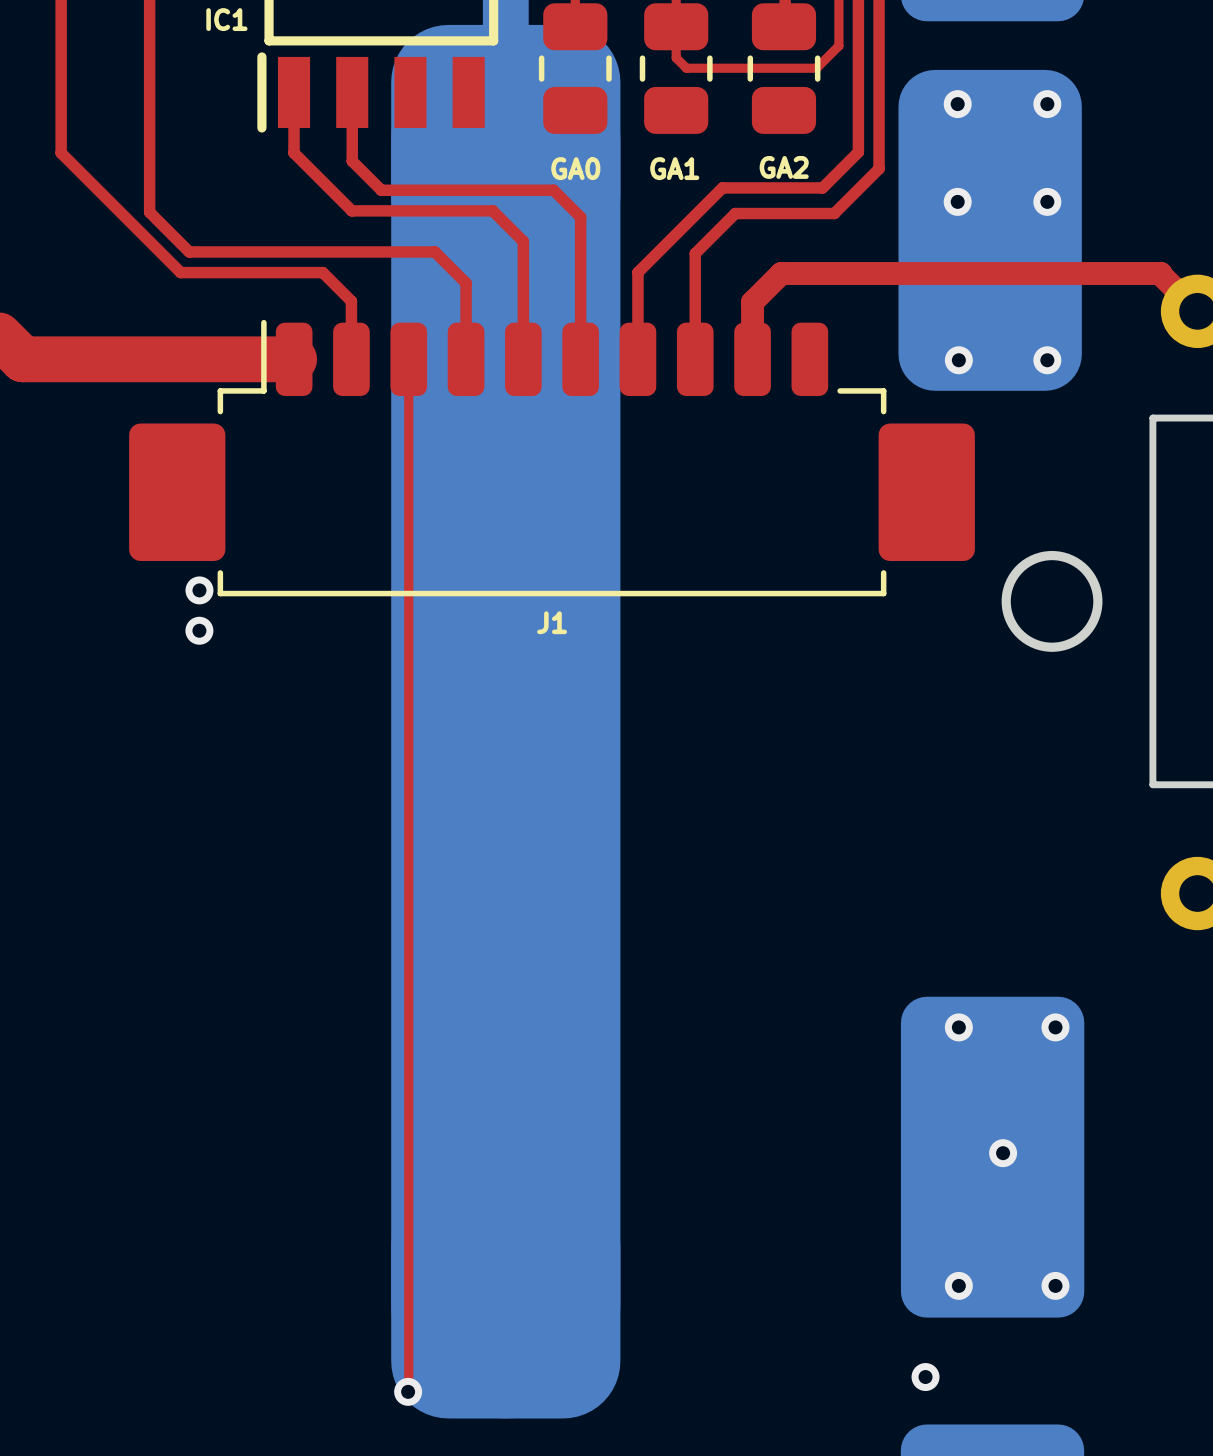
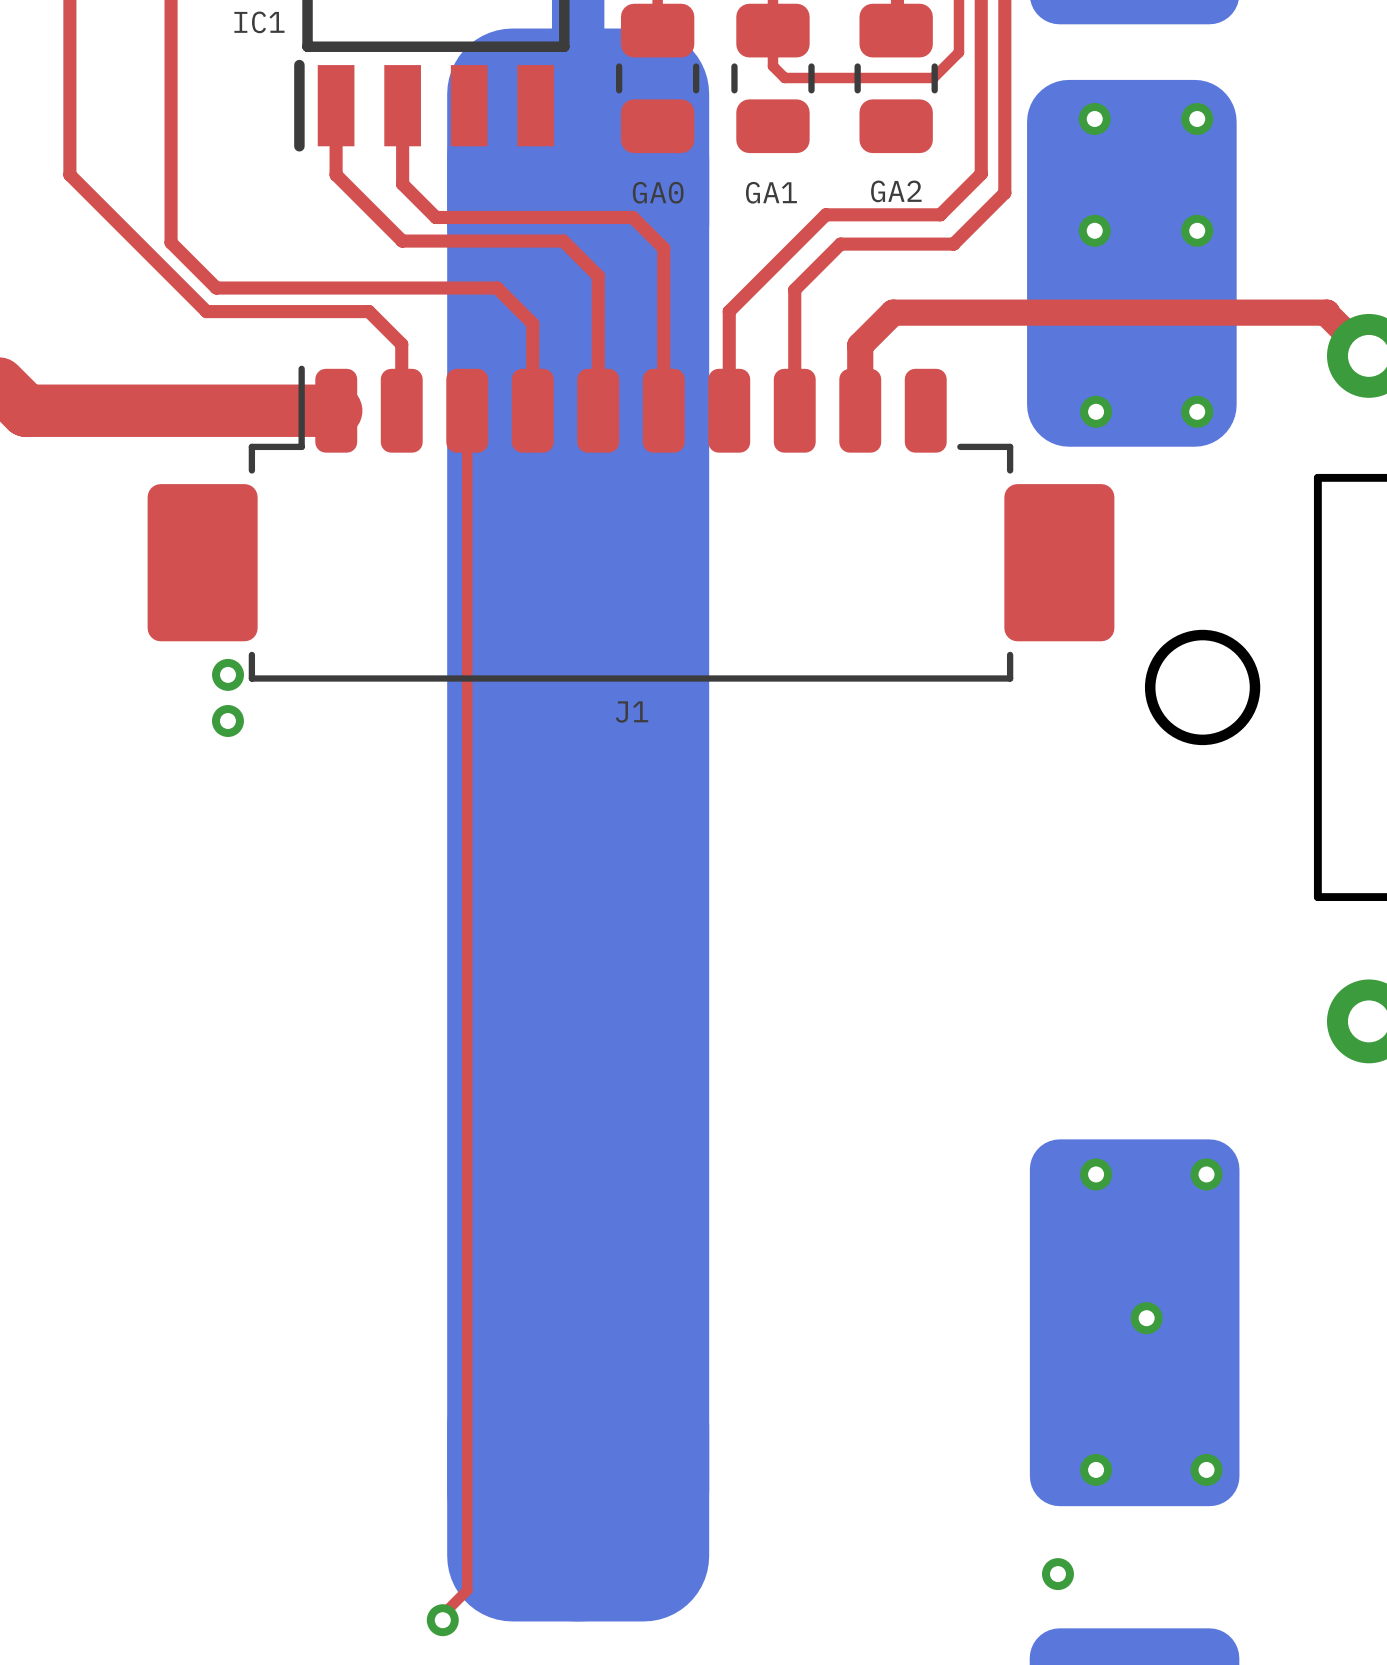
top track: none -> (466, 1591) (442, 1614) (442, 1620)
via position: (408, 1391) -> (442, 1620)

